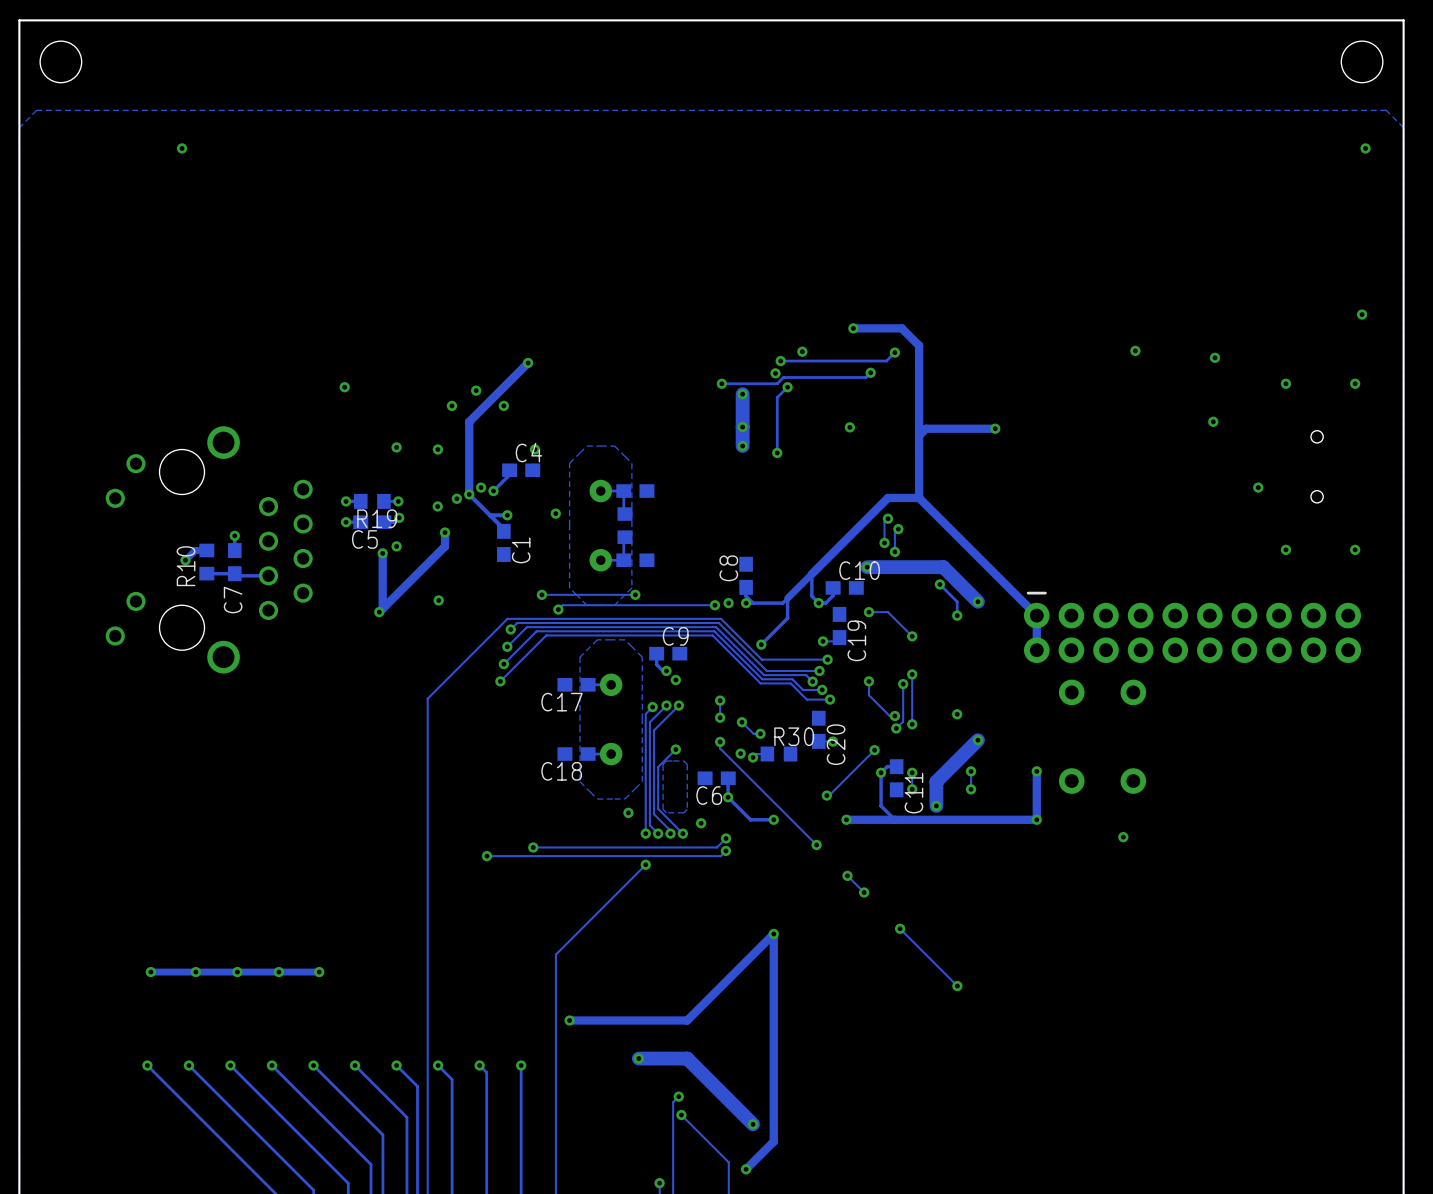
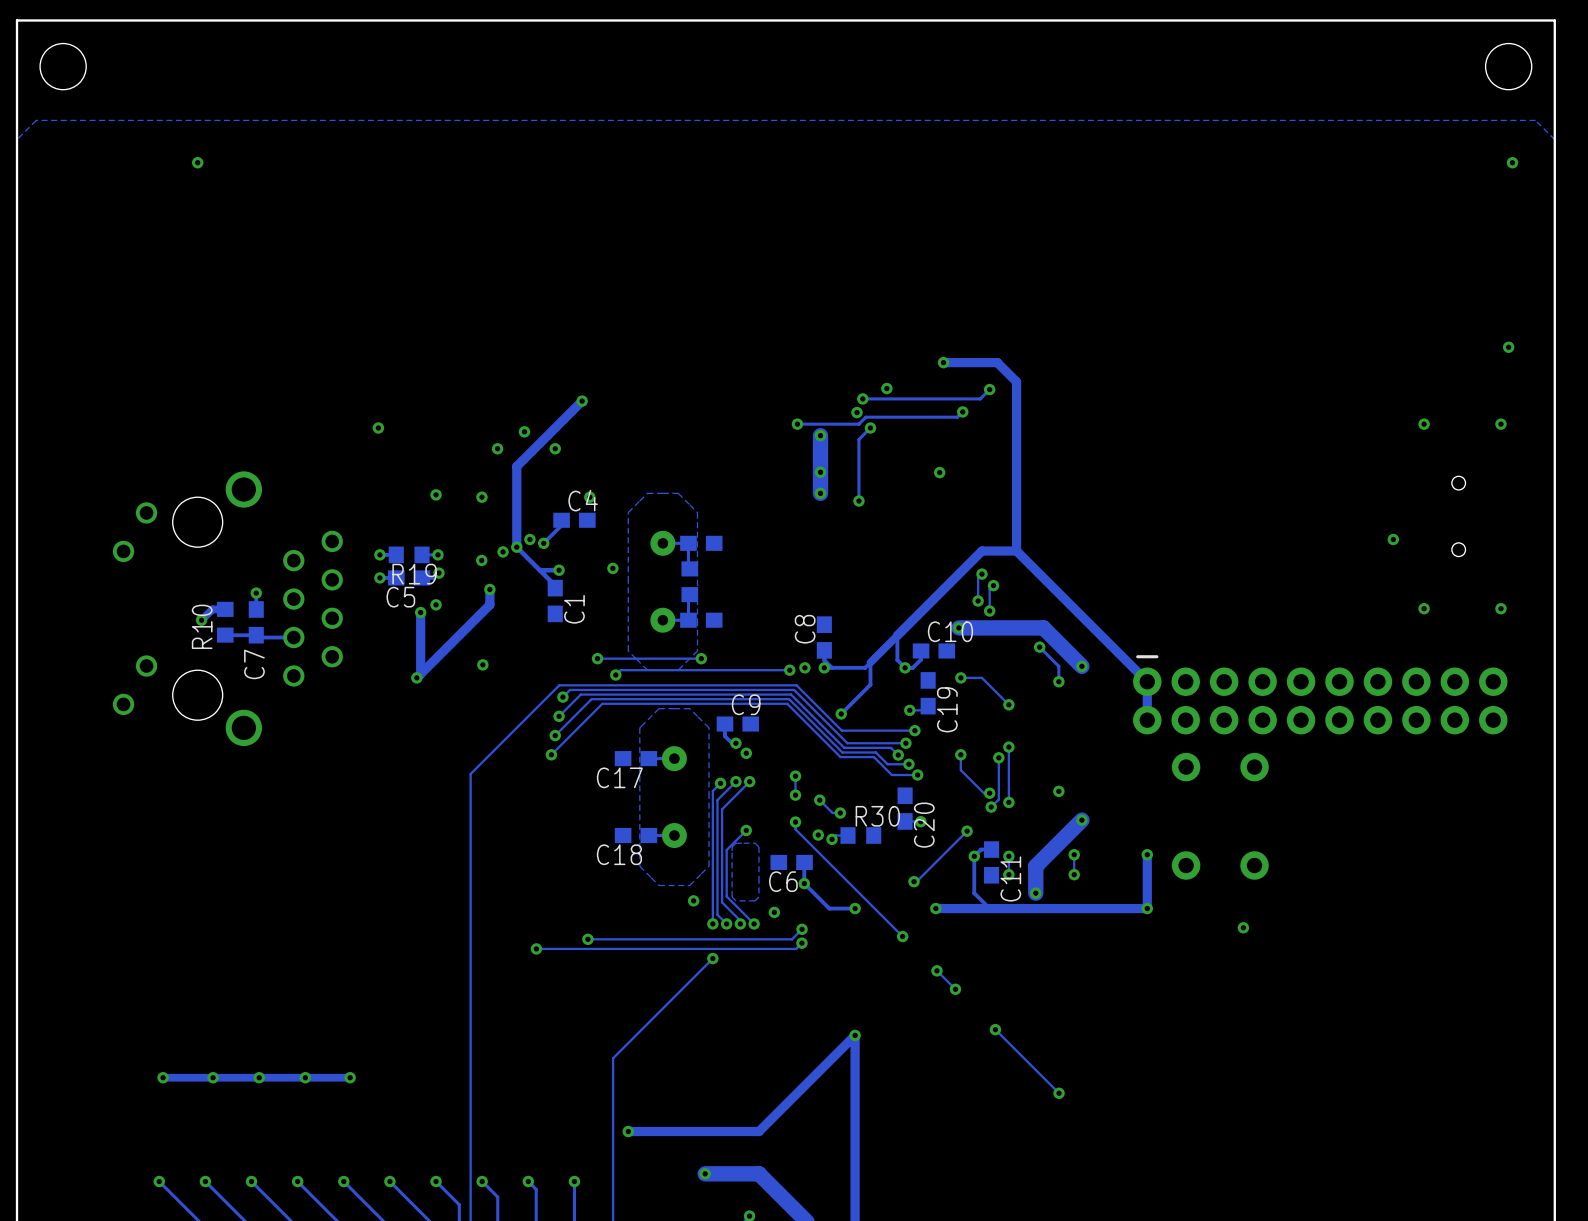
via: (1135, 350) -> none
via: (1215, 357) -> none
via: (1213, 421) -> none
track: (995, 428) (926, 428) (919, 435) -> none
via: (995, 428) -> none

